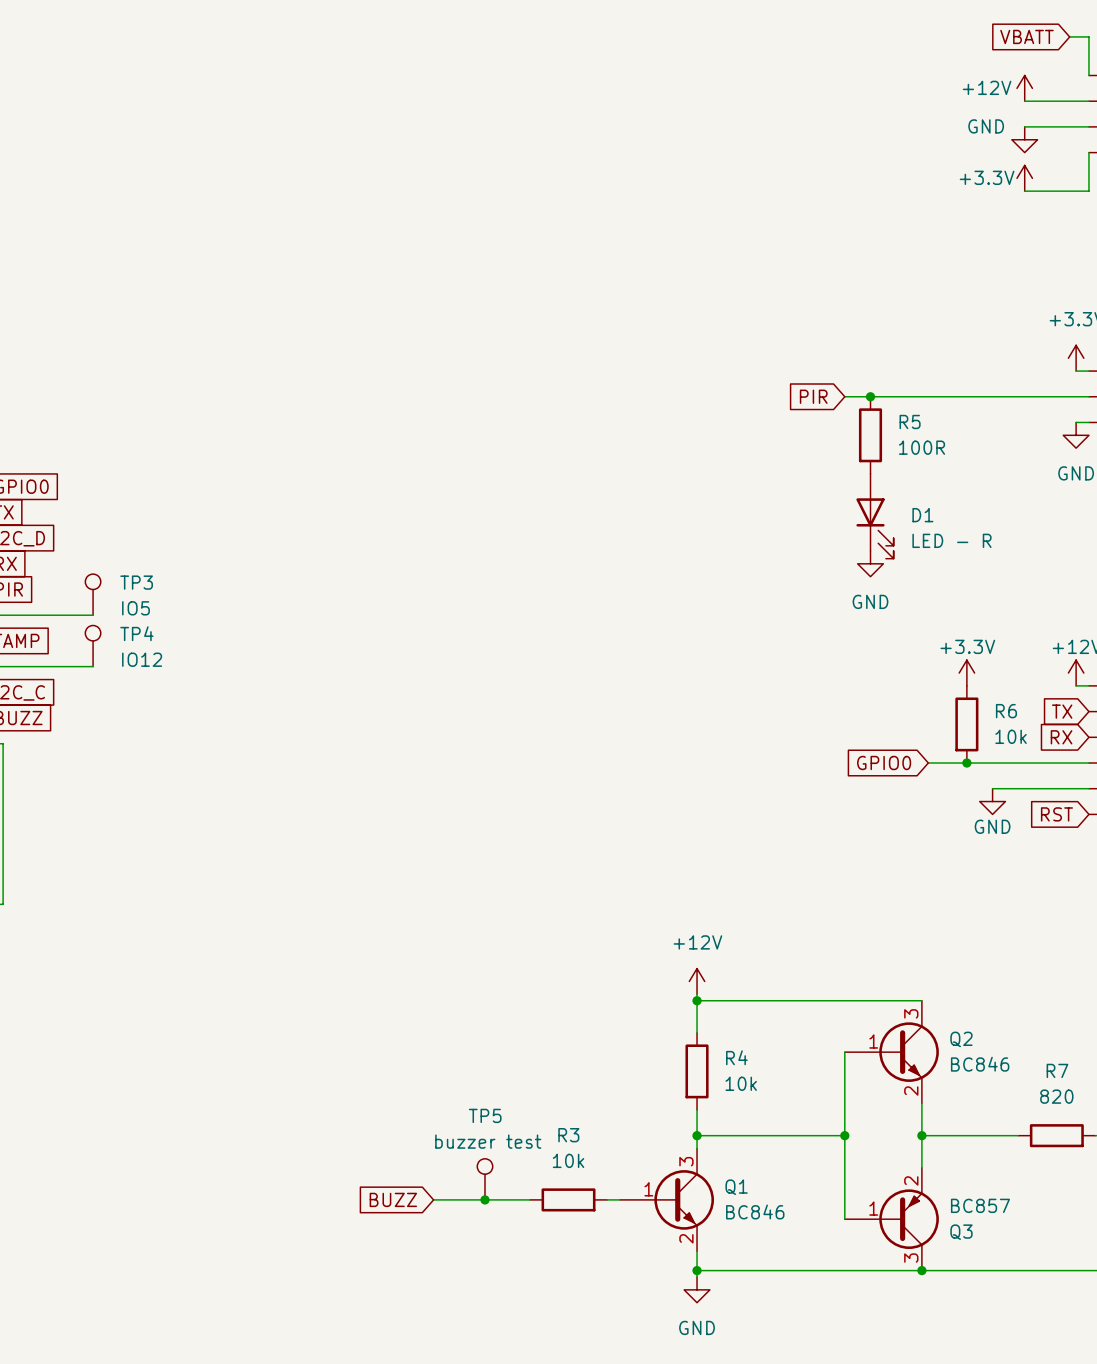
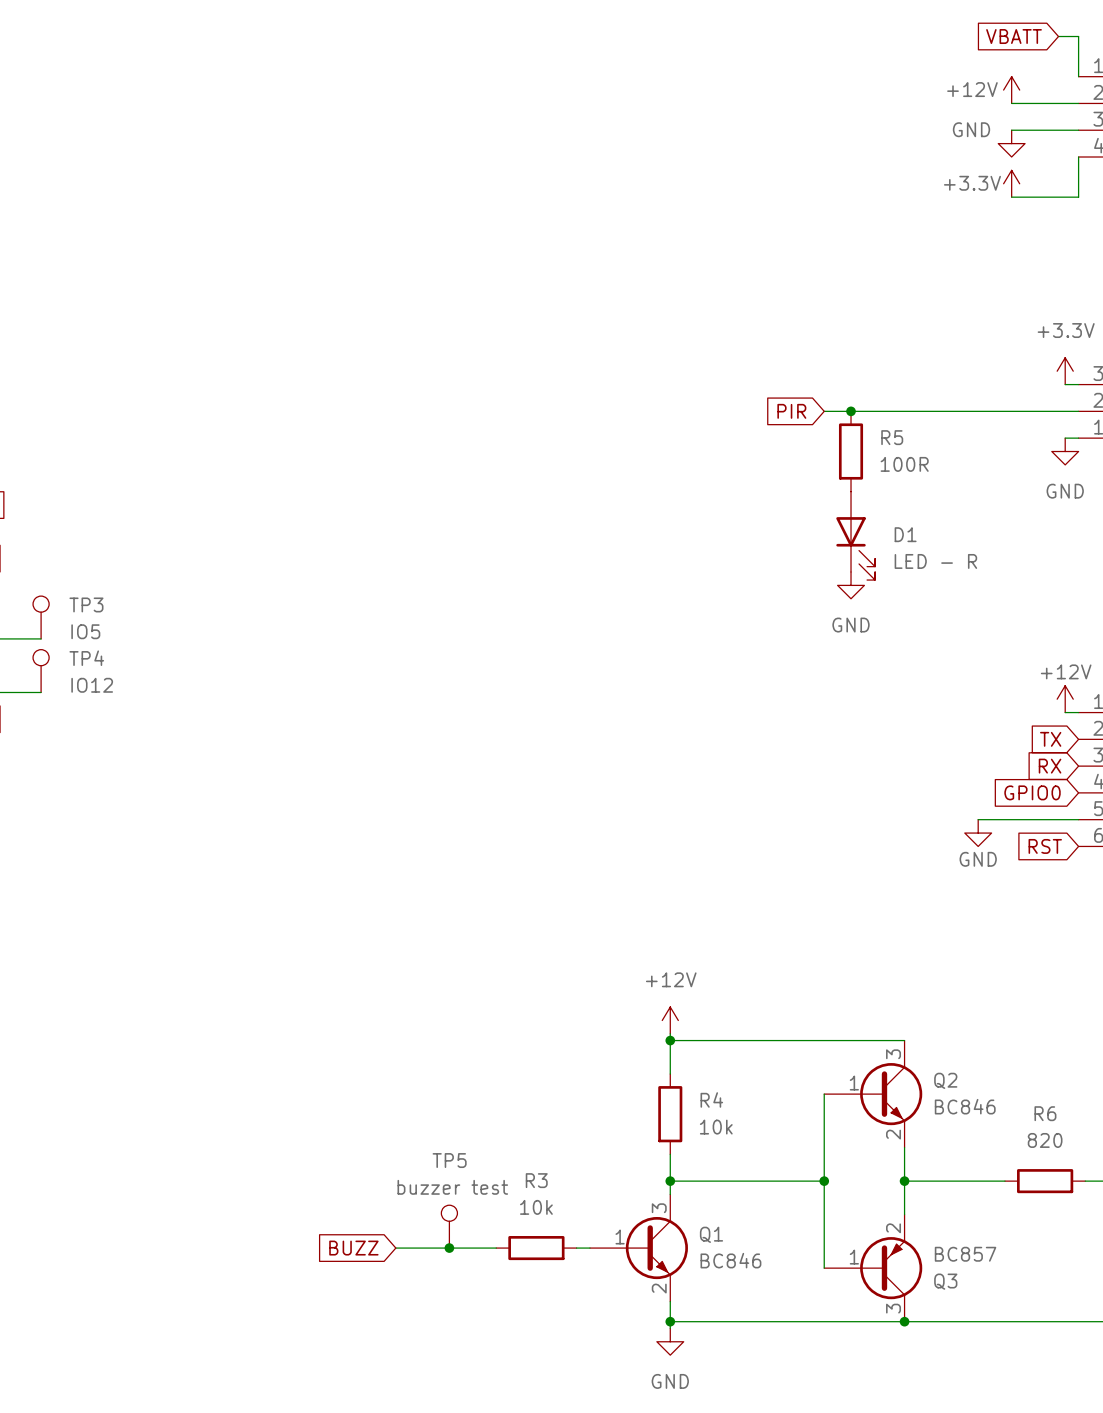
power symbol: +3.3V (966, 673) -> none
R6: 10k (966, 724) -> none
global label position: GPIO0 (884, 763) -> GPIO0 (1032, 792)
wire: (928, 763) (1088, 763) -> none
junction: (966, 763) -> none
R7 name: R7 (1057, 1070) -> R6 (1045, 1113)

